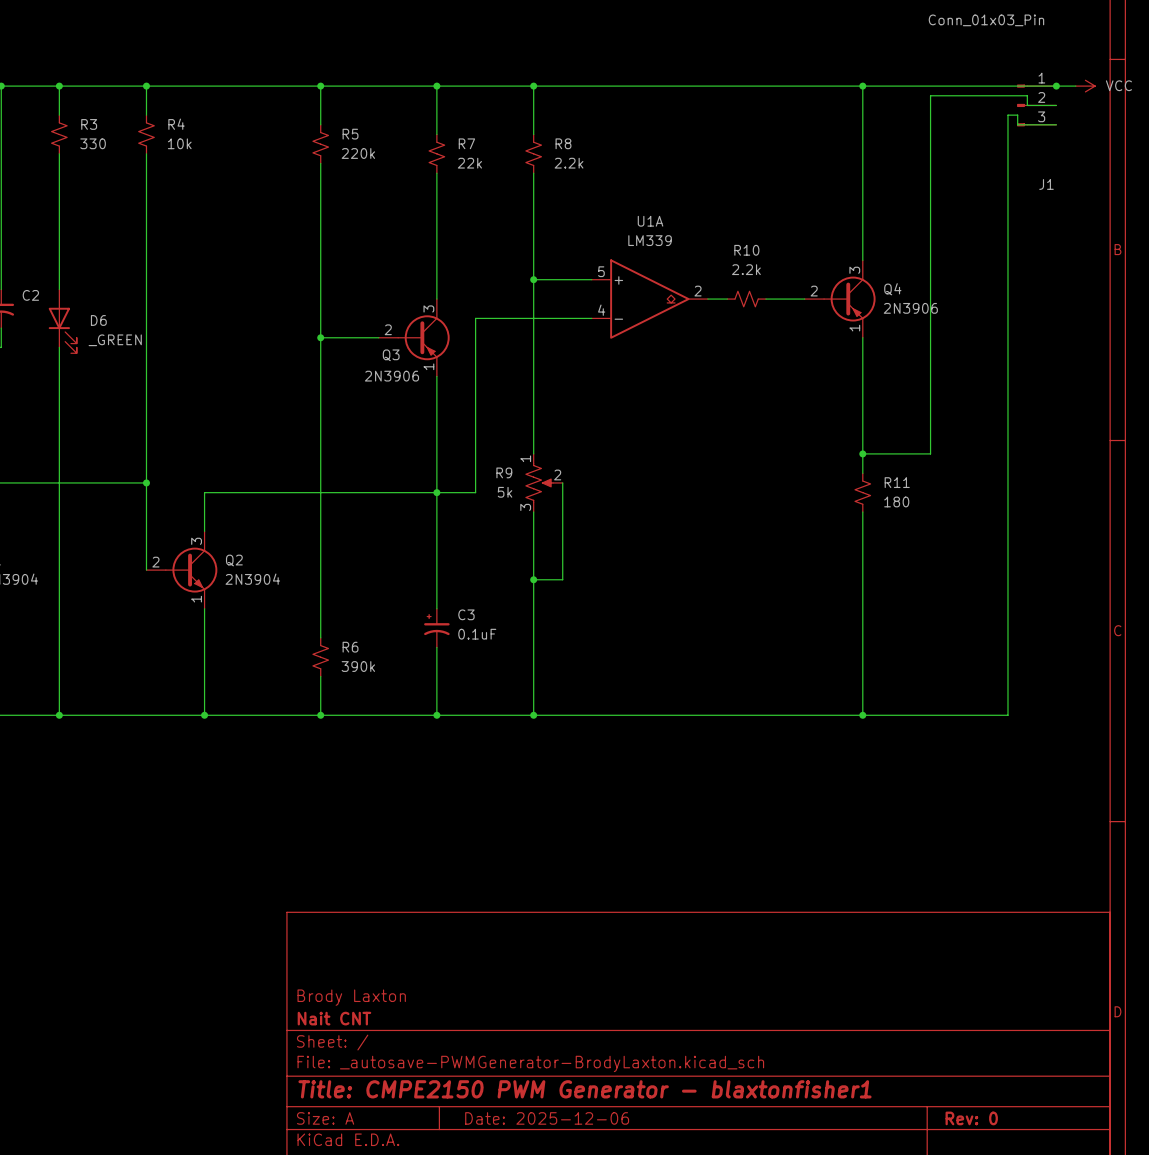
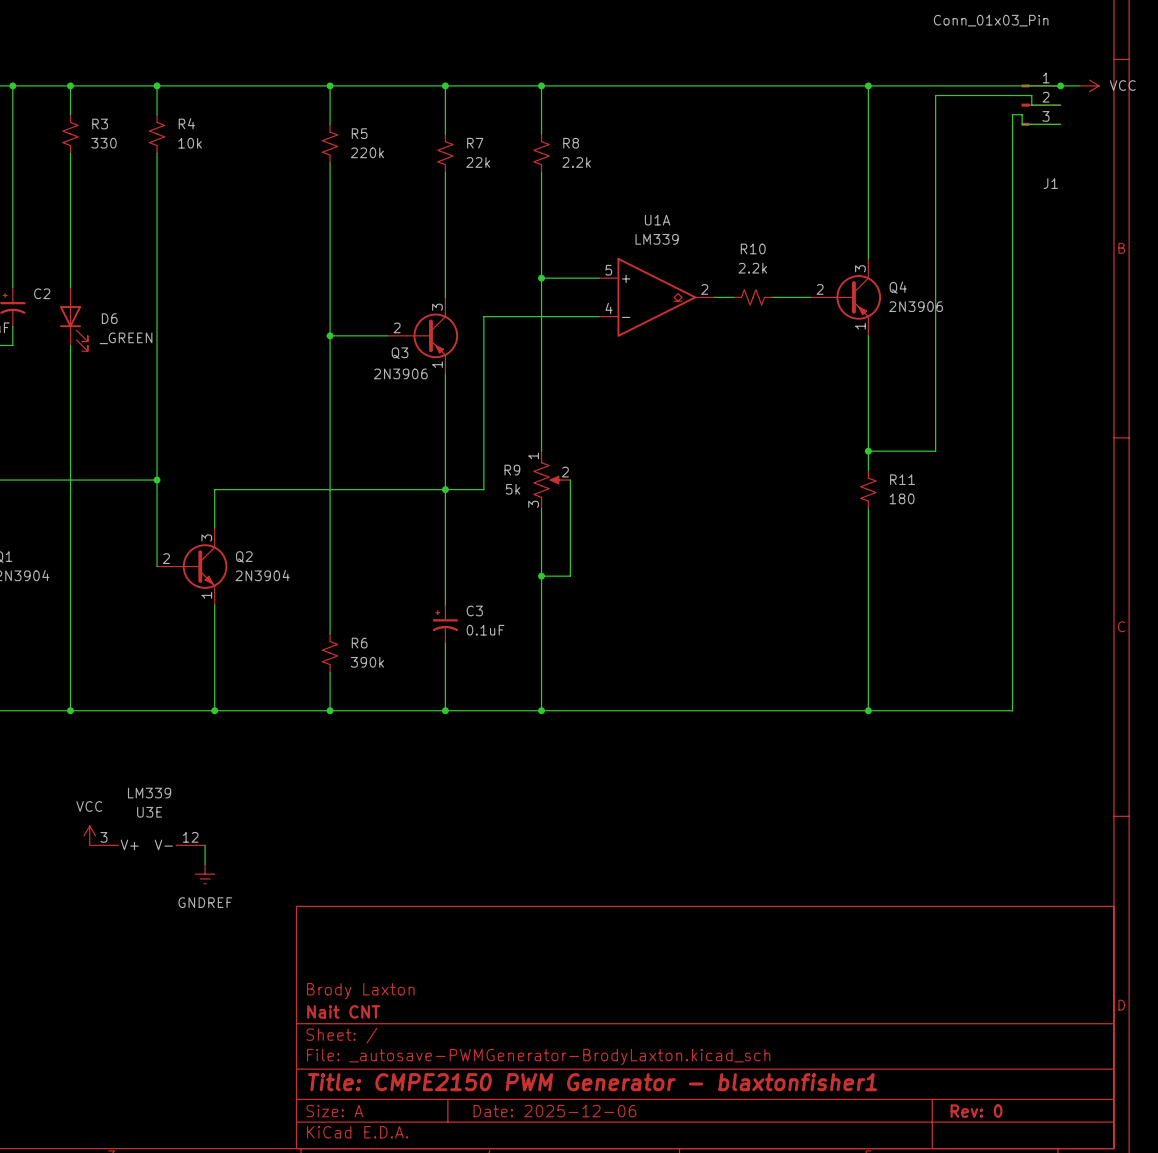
power symbol: none -> VCC (89, 835)
U3E: none -> LM339 (147, 845)
wire: none -> (205, 845) (205, 864)
power symbol: none -> GNDREF (205, 874)

